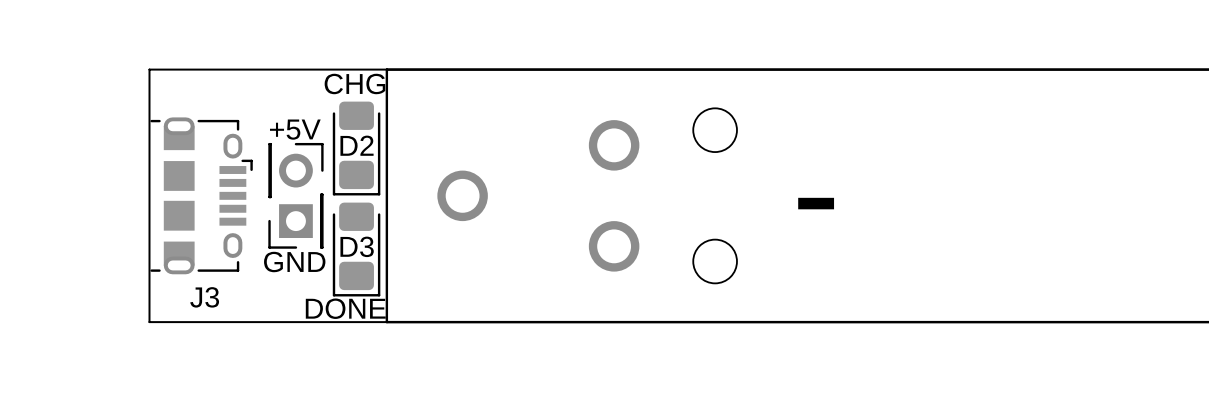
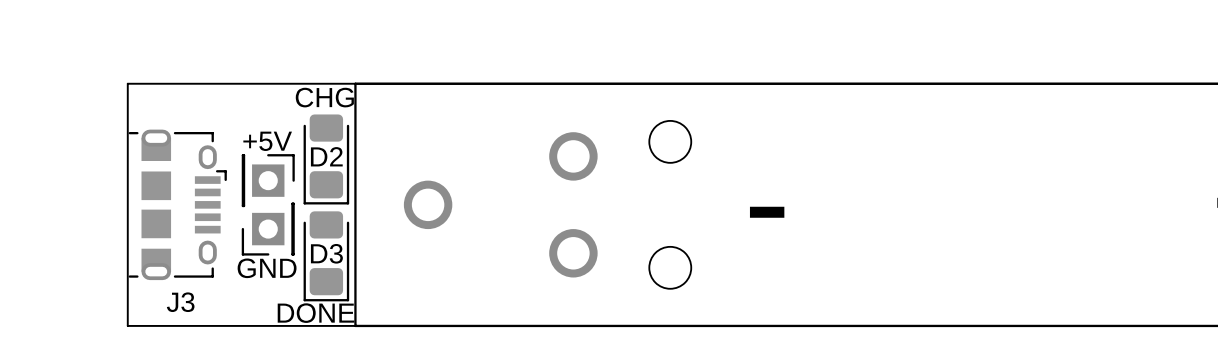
part footprint: [268, 142, 324, 199] -> [241, 154, 295, 208]

